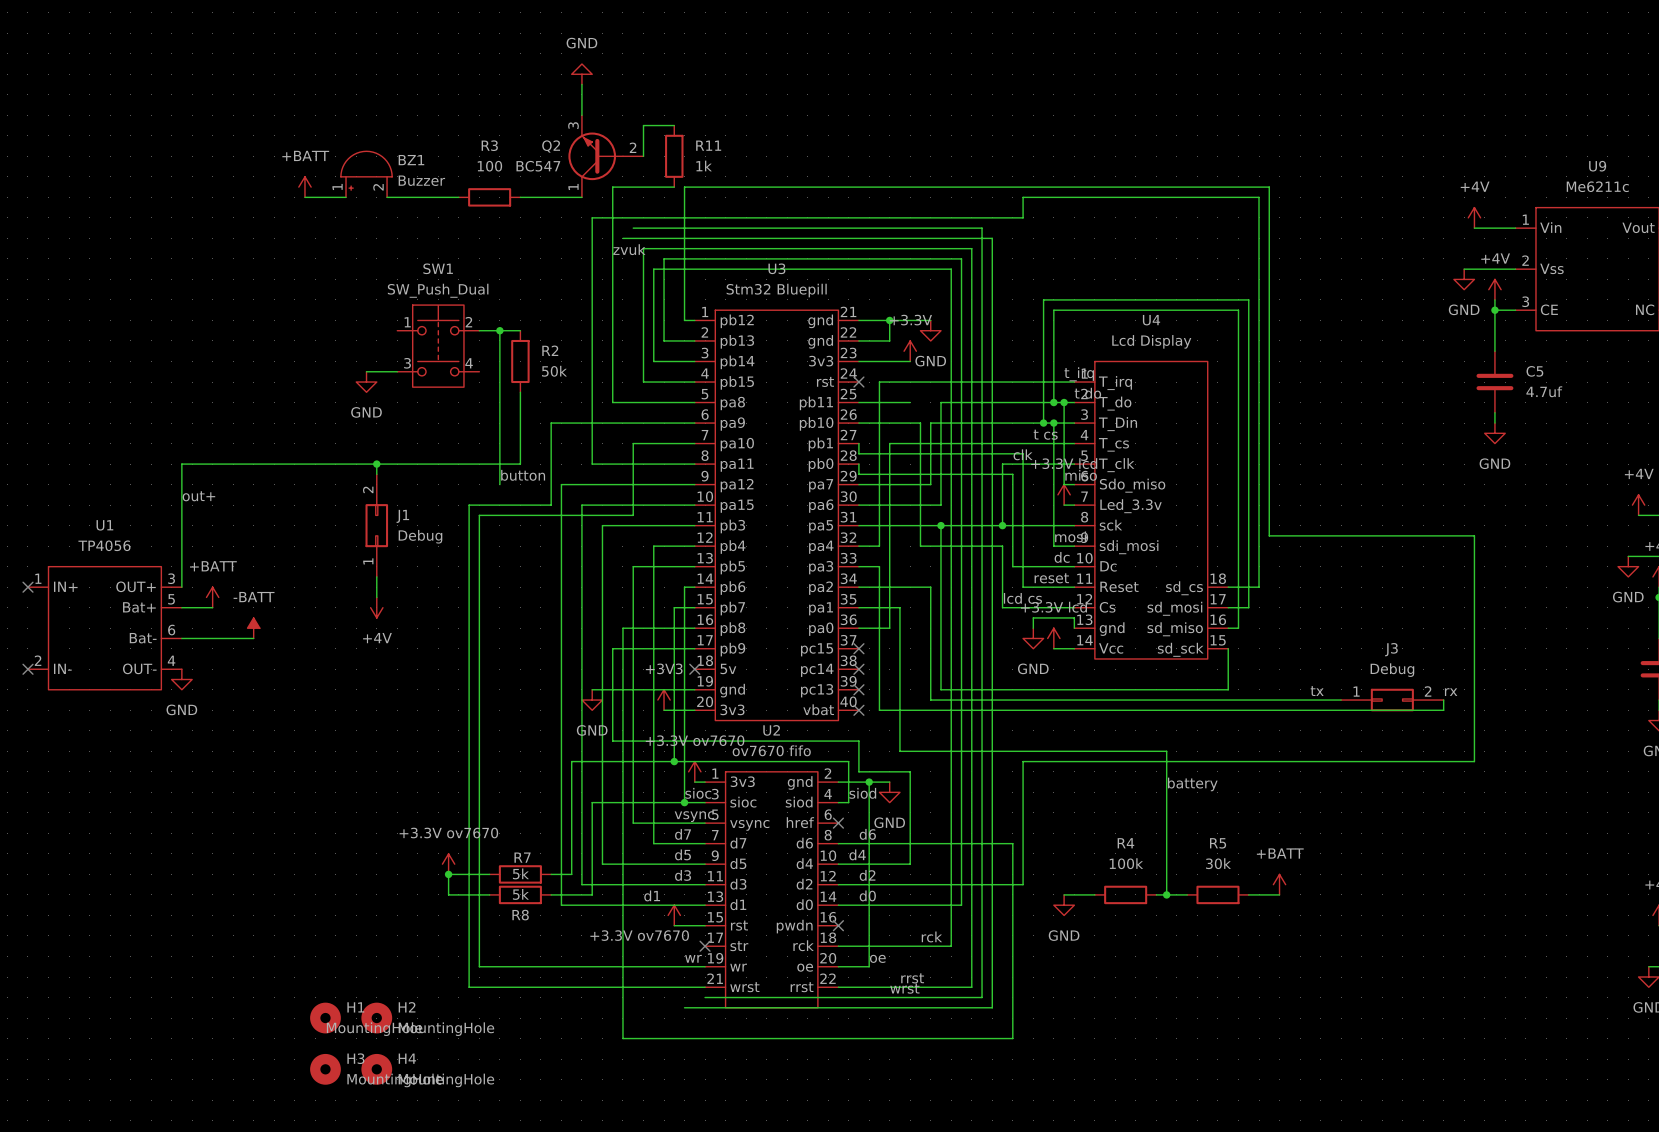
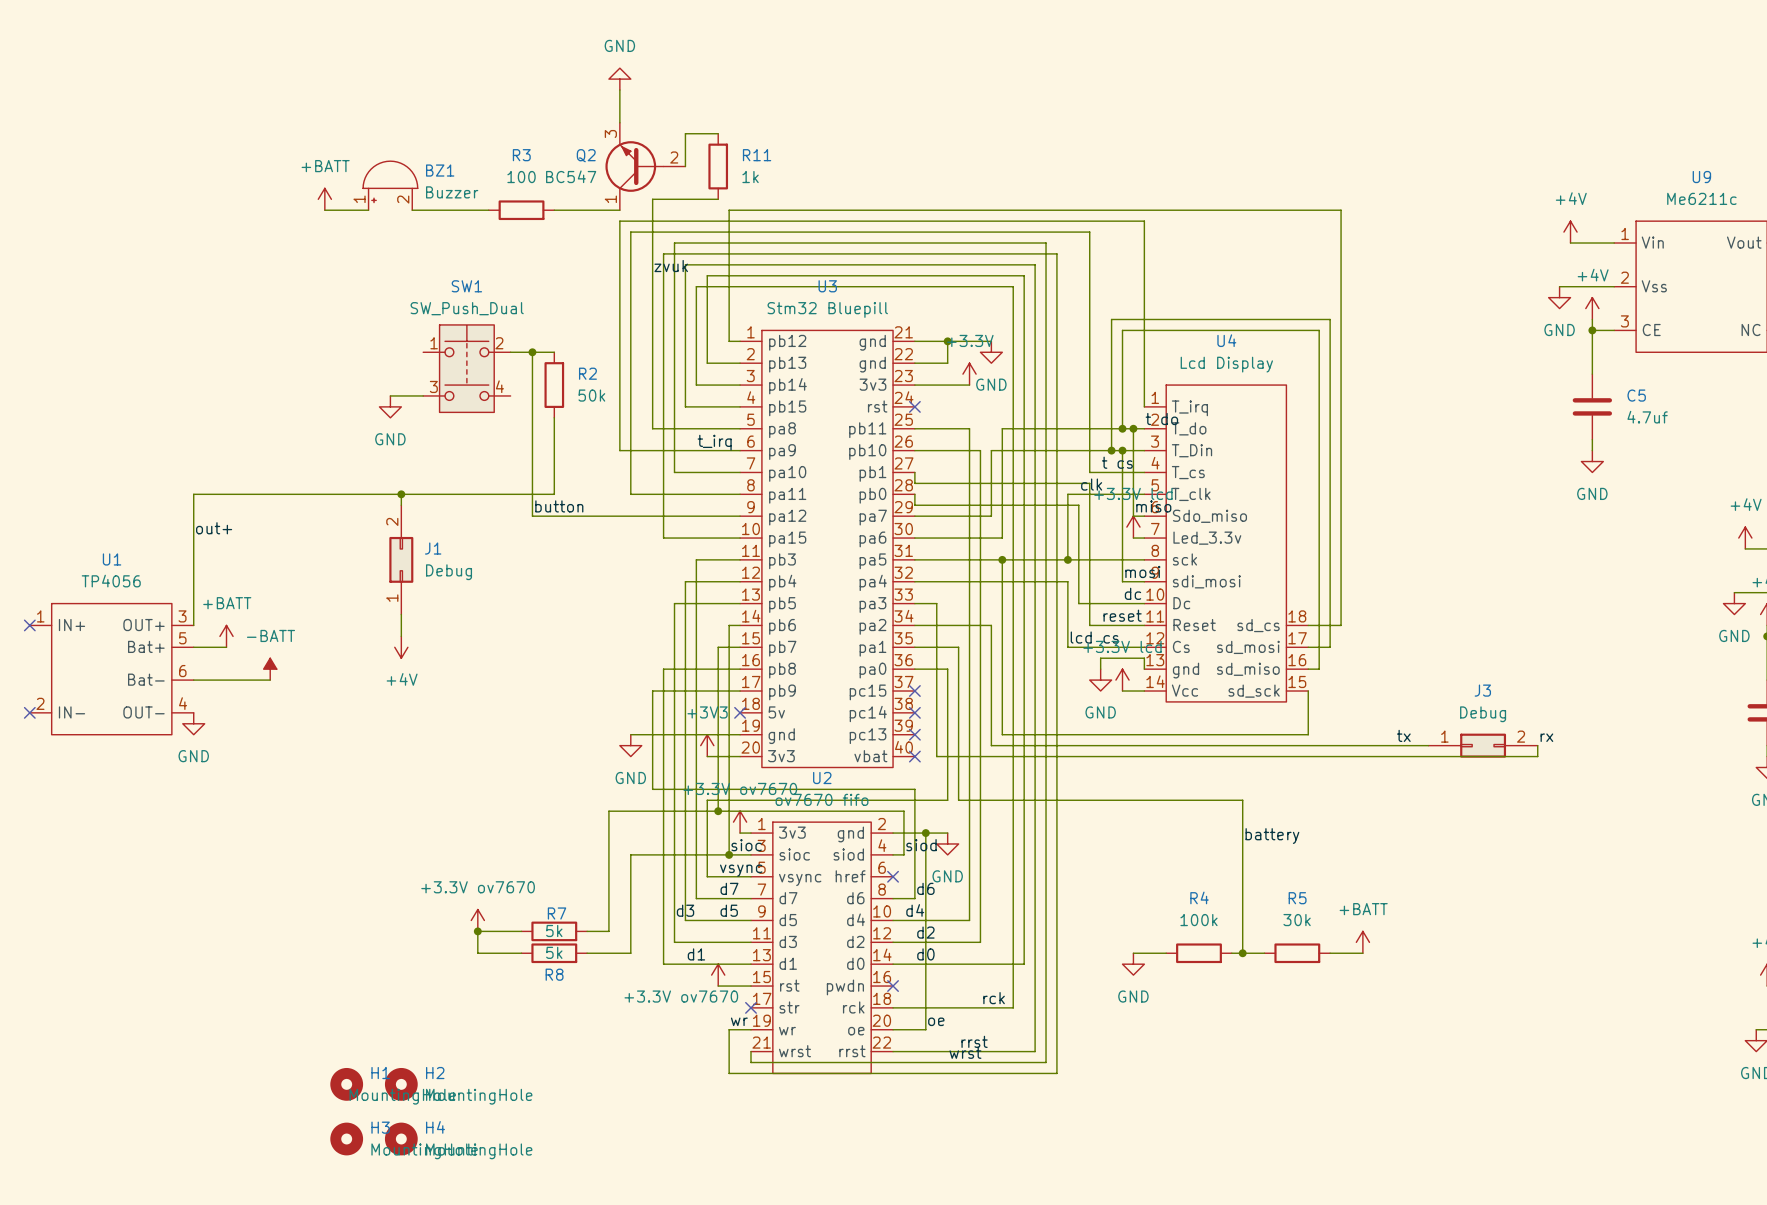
wire: (684, 197) (684, 187) (1269, 187) (1269, 535) (1474, 535) (1474, 761) (1023, 761) (1023, 884) (920, 884) -> (936, 581) (980, 581) (980, 942)
wire: none -> (729, 210) (1089, 210)
wire: (1023, 197) (1023, 217) -> (1089, 472) (1089, 232)
wire: none -> (674, 243) (674, 472)
label: t_irq (1079, 374) -> none
wire: (1074, 382) (879, 382) (879, 546) -> (1144, 406) (1144, 221) (619, 221) (619, 450)
wire: none -> (969, 428) (969, 822)
label: none -> t_irq (714, 442)
wire: (581, 423) (551, 423) (551, 505) (469, 505) (469, 987) (705, 987) -> (750, 1062) (750, 1051)
wire: (633, 443) (633, 515) (479, 515) (479, 966) (684, 966) -> (729, 1073) (729, 1029)
wire: (1023, 443) (889, 443) (889, 628) -> (707, 876) (707, 800) (947, 800) (947, 669)
wire: (561, 484) (561, 905) (622, 905) (622, 1038) (1012, 1038) (1012, 843) (858, 843) -> (598, 516) (532, 516)
wire: (622, 505) (581, 505) (581, 884) (633, 884) -> (663, 538) (663, 253)
wire: (653, 525) (602, 525) (602, 864) (643, 864) -> (696, 559) (696, 581) (685, 581) (685, 920)
wire: (858, 771) (910, 771) -> (914, 822) (914, 898)
wire: (633, 823) (664, 823) -> (674, 876) (674, 942)
label position: d3 (683, 875) -> d3 (685, 910)

